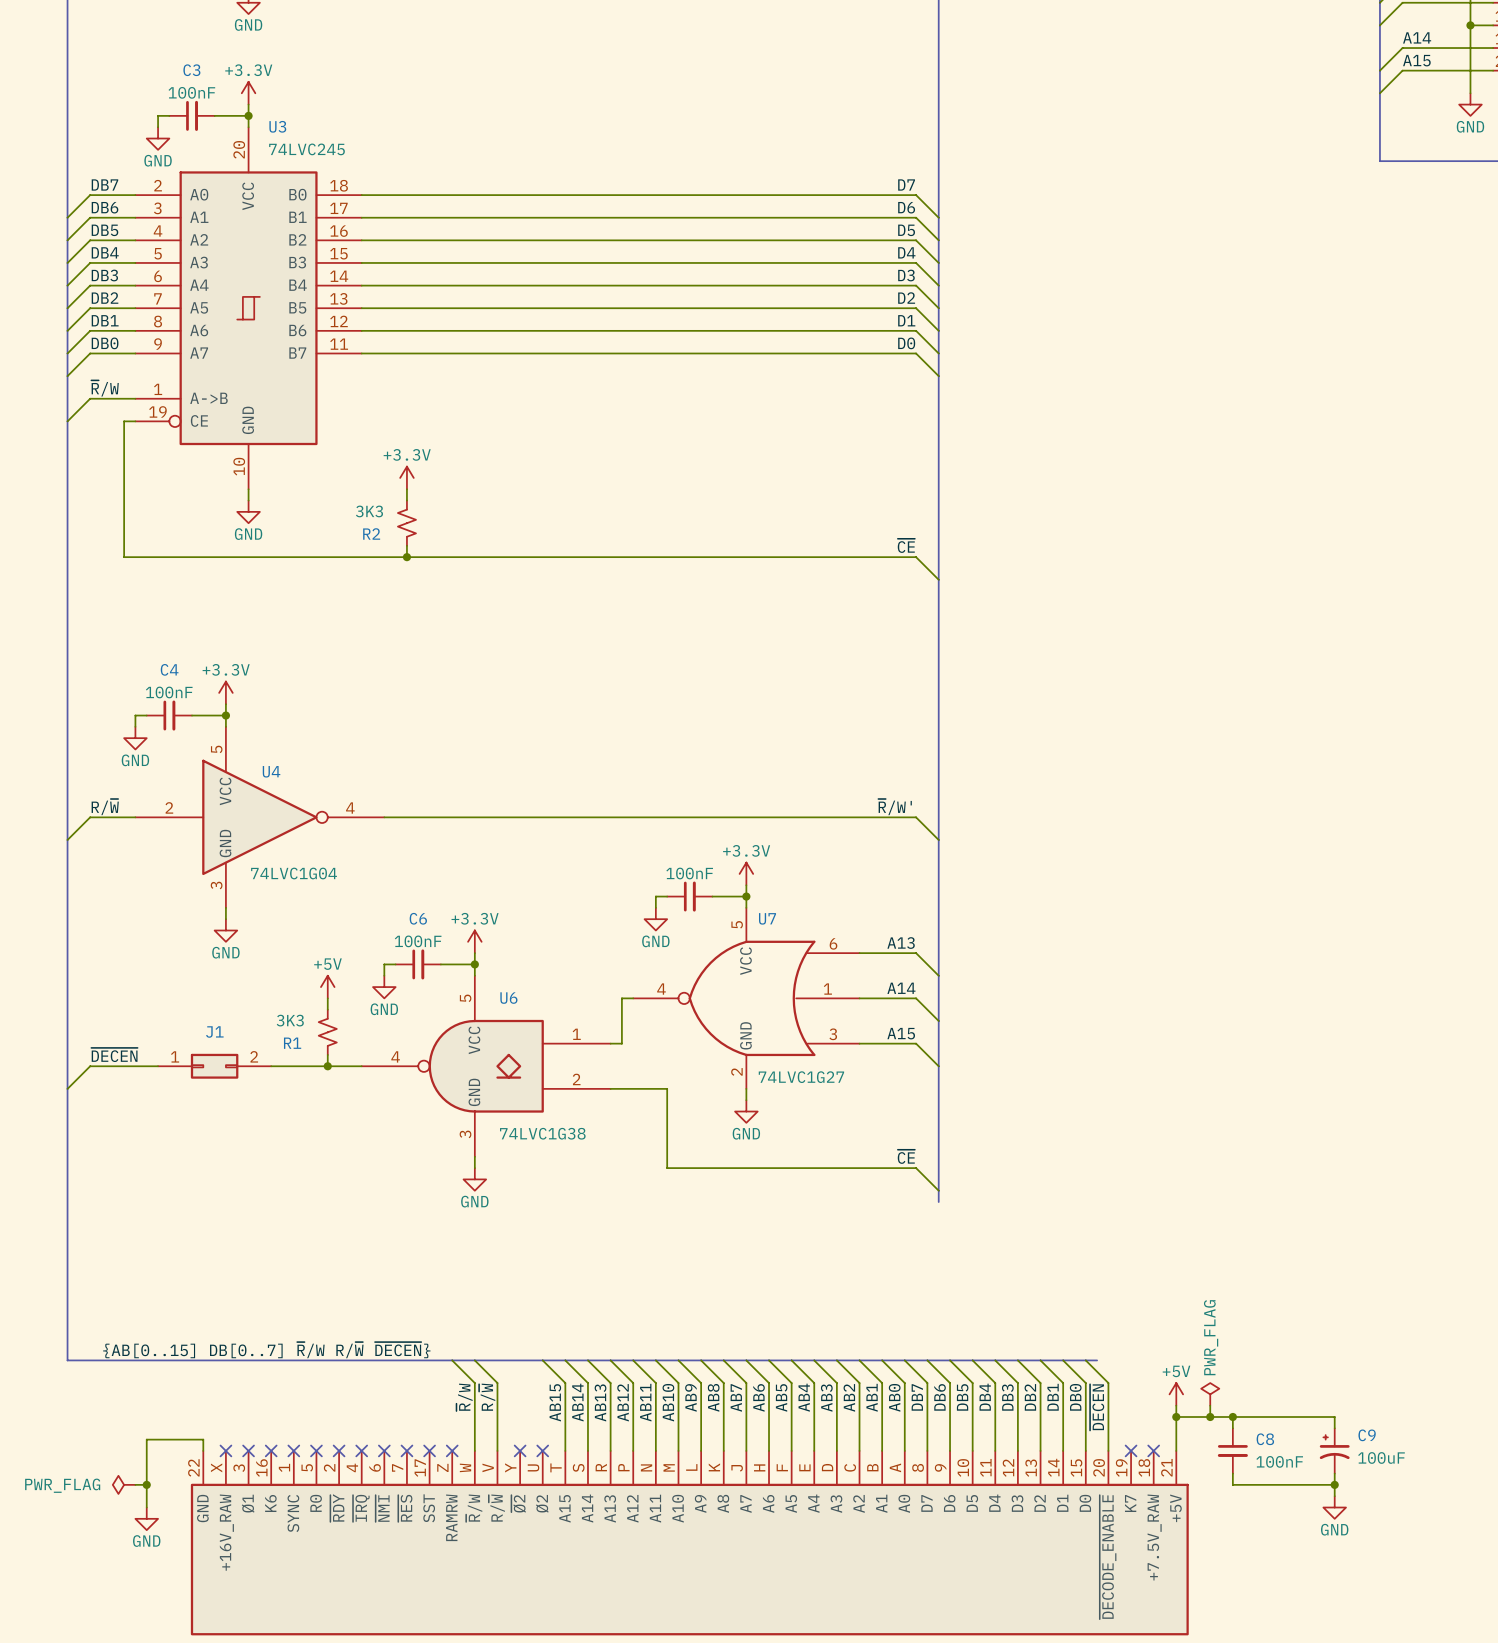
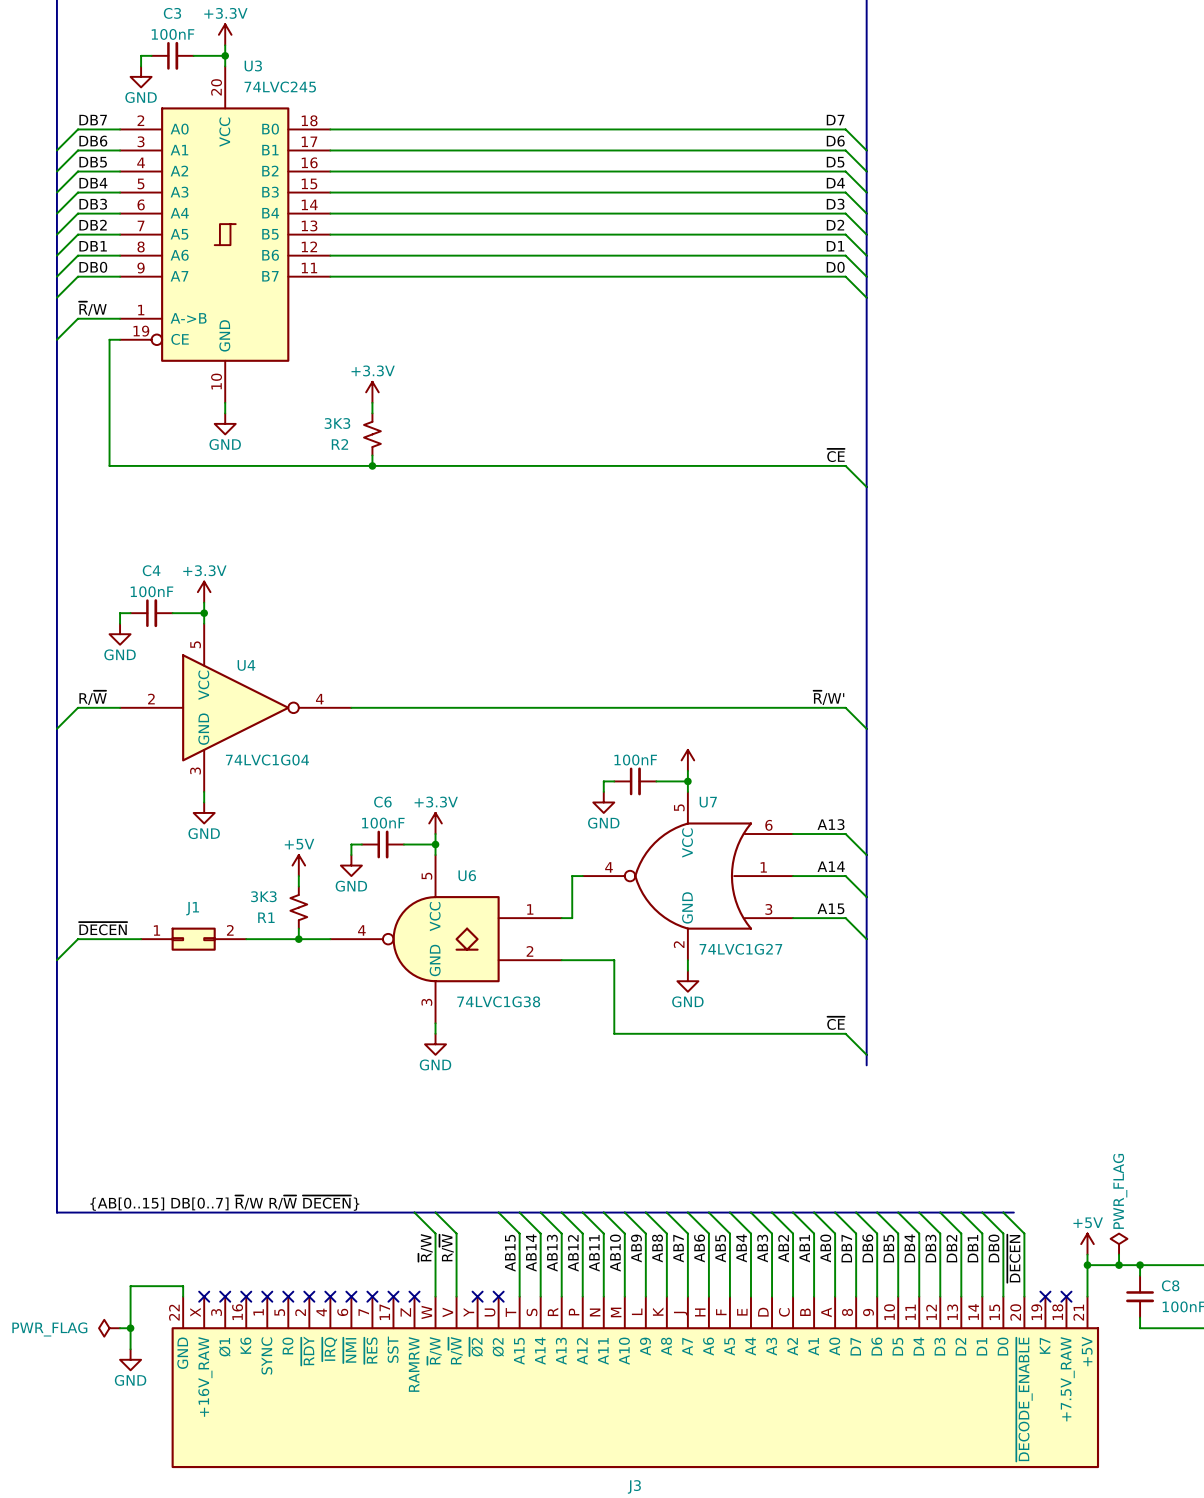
power symbol text: +3.3V (746, 850) -> none

